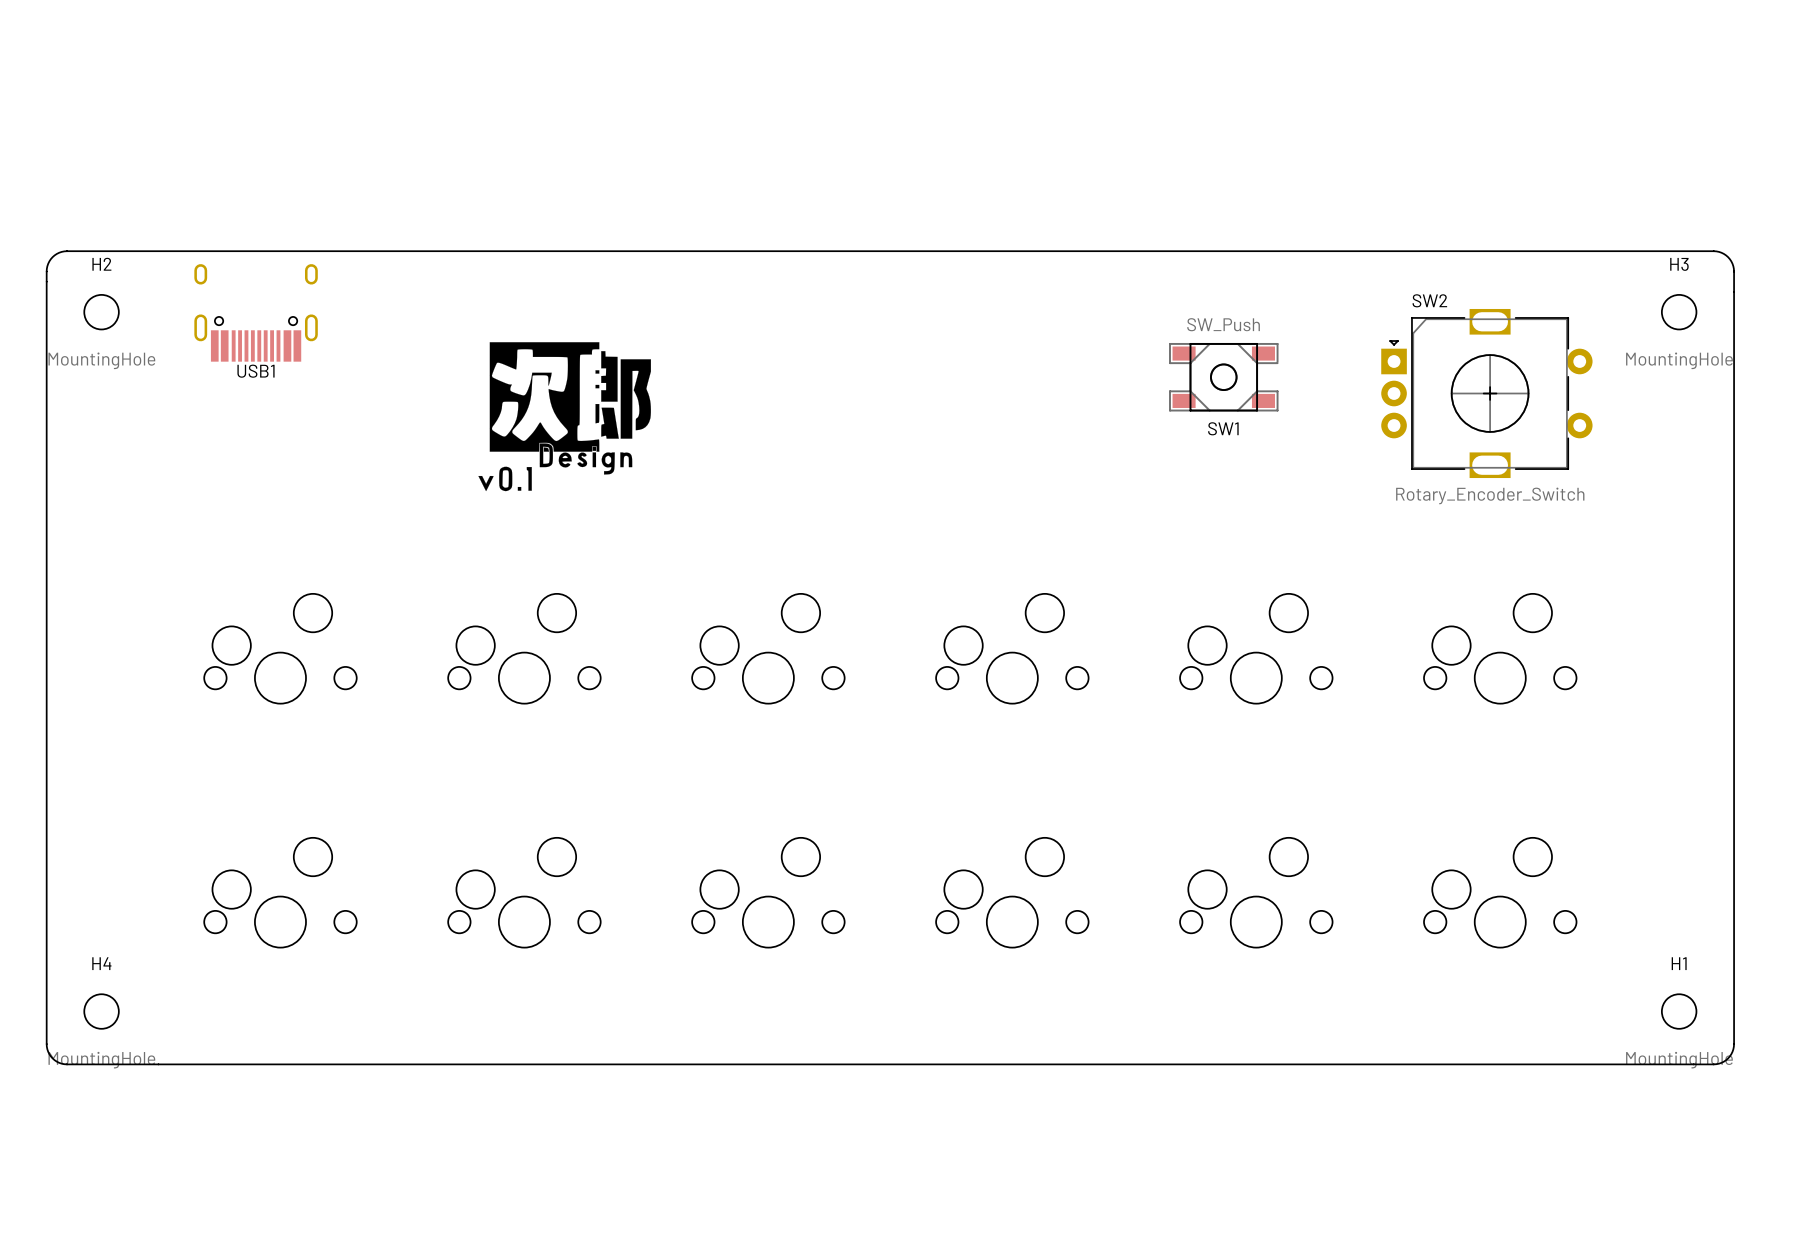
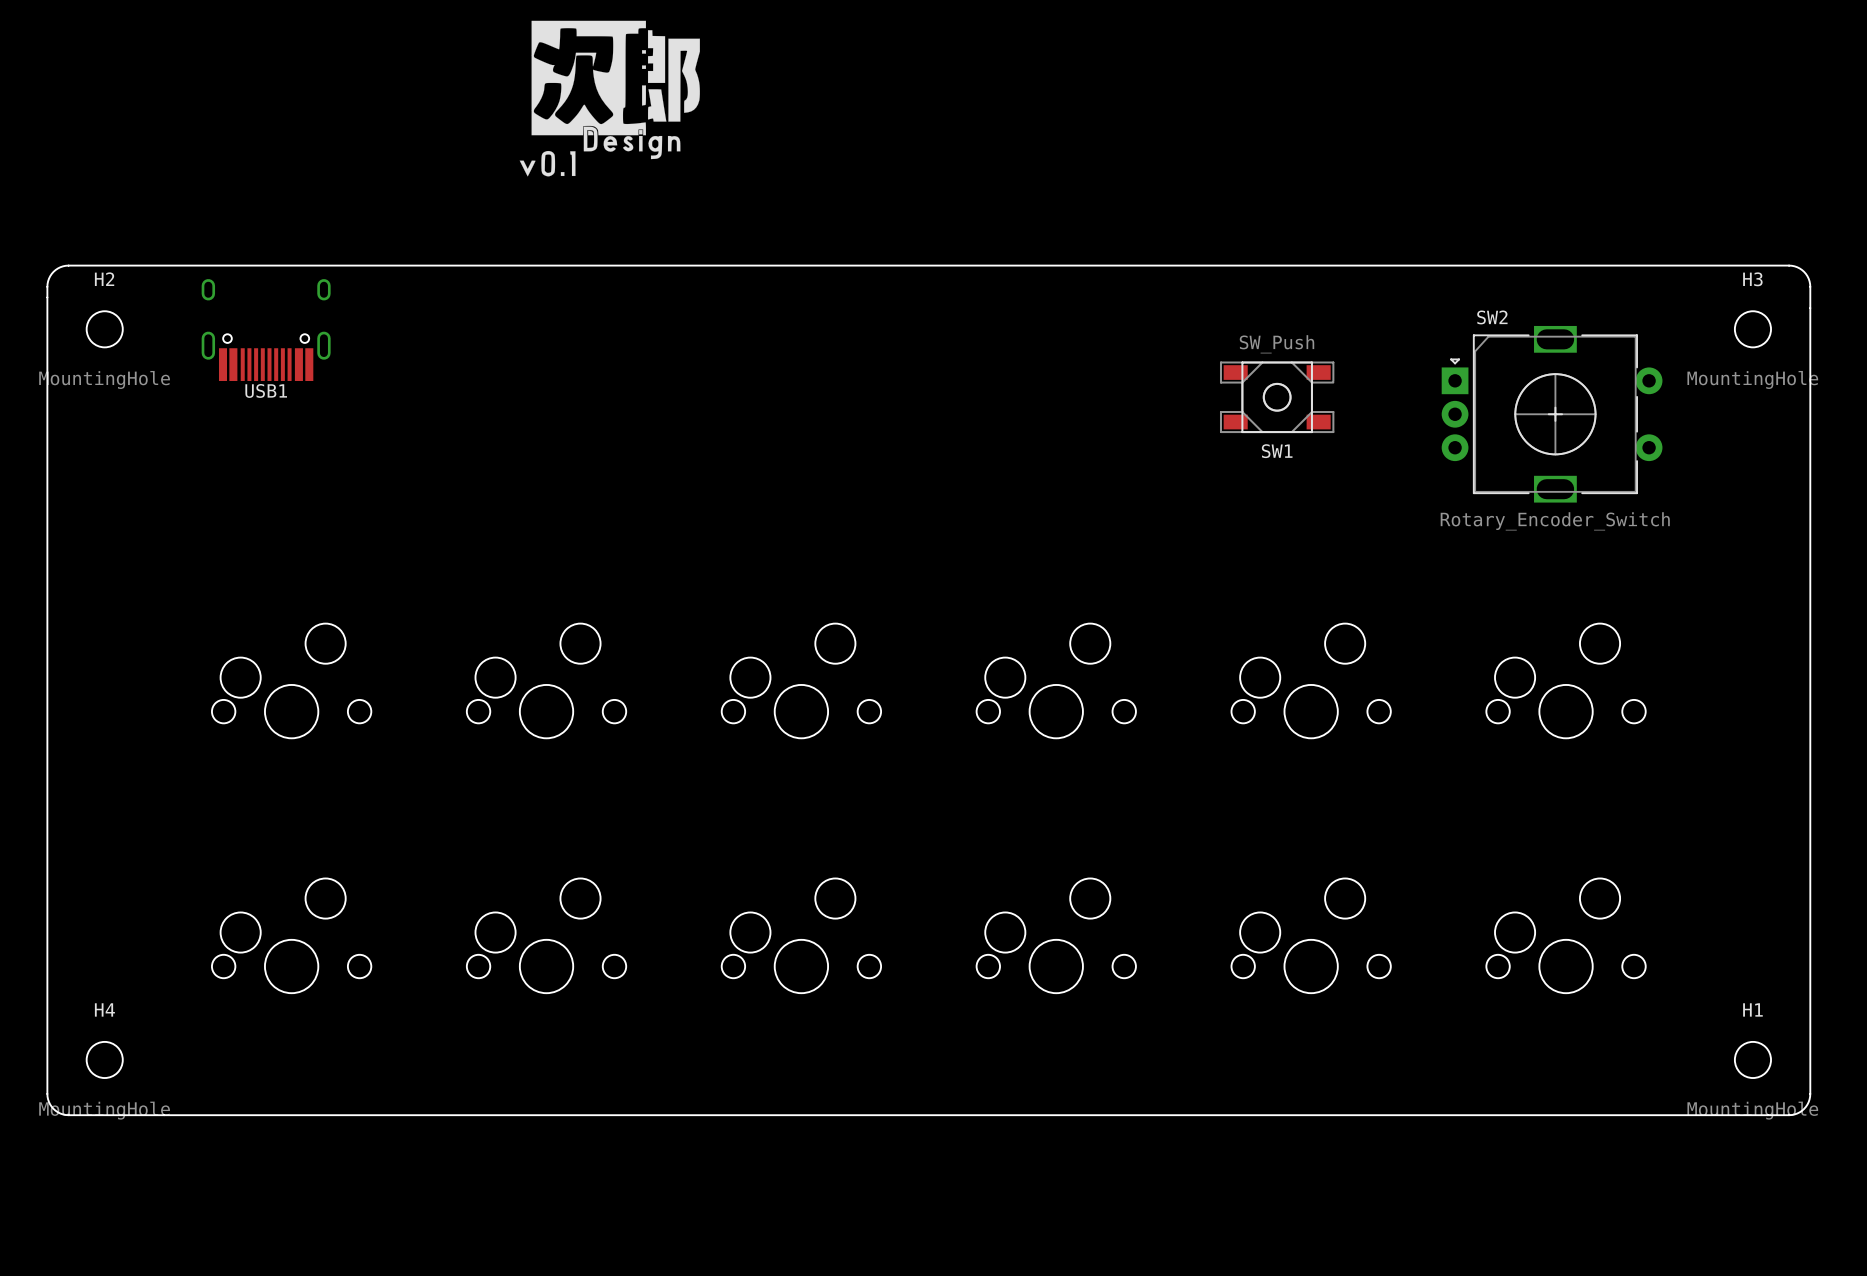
drawing: none -> [519, 20, 700, 177]
drawing: [478, 342, 651, 492] -> none

